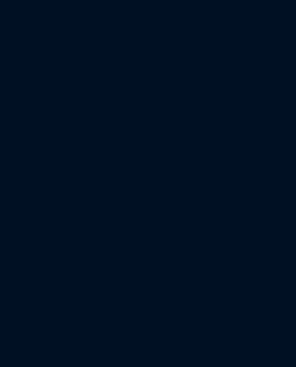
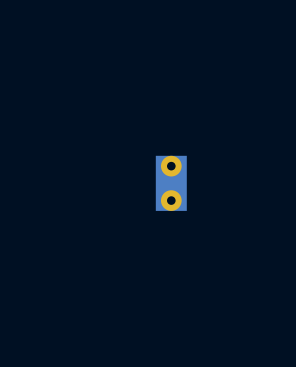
part: none -> (171, 183)

